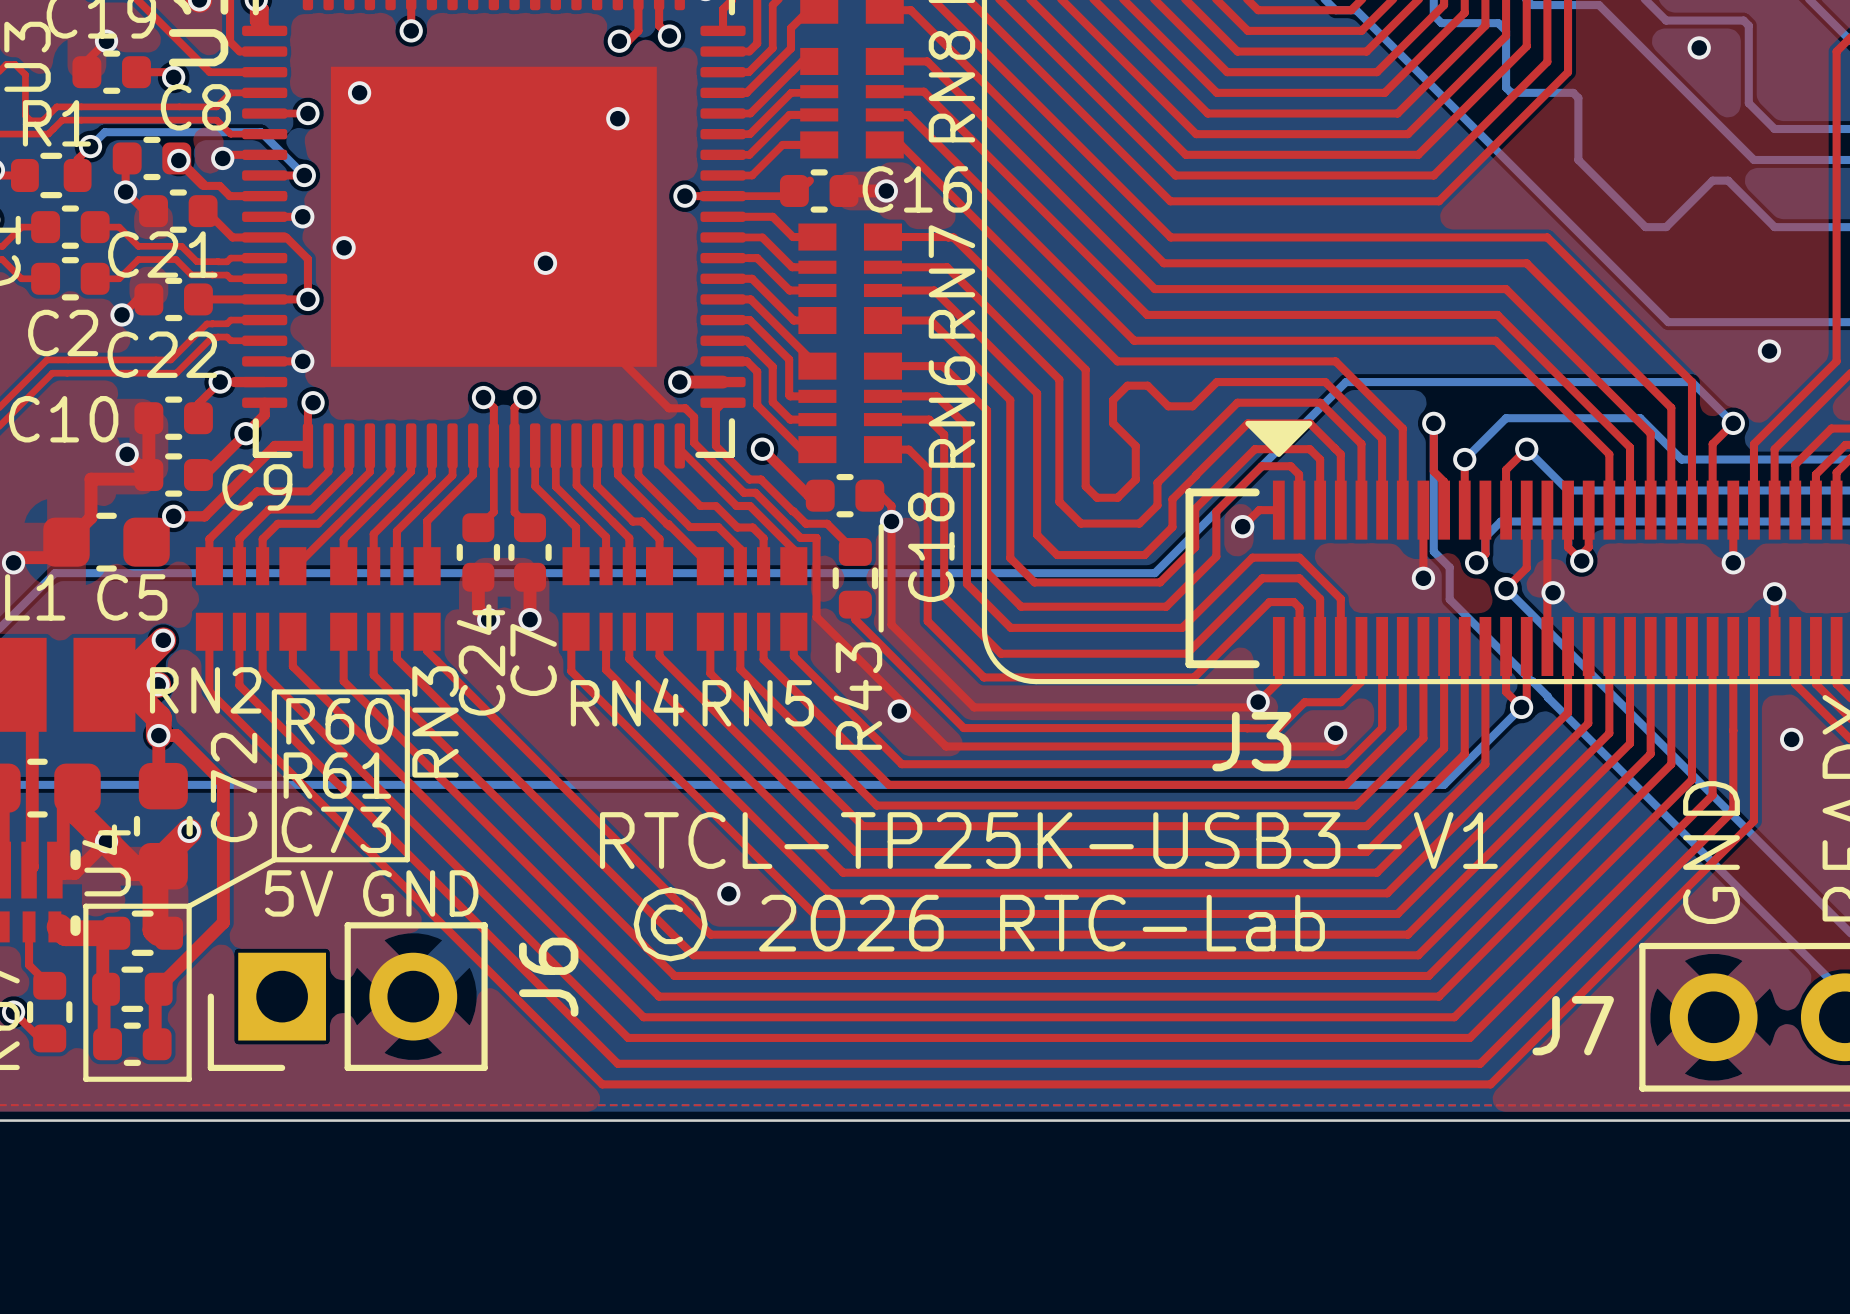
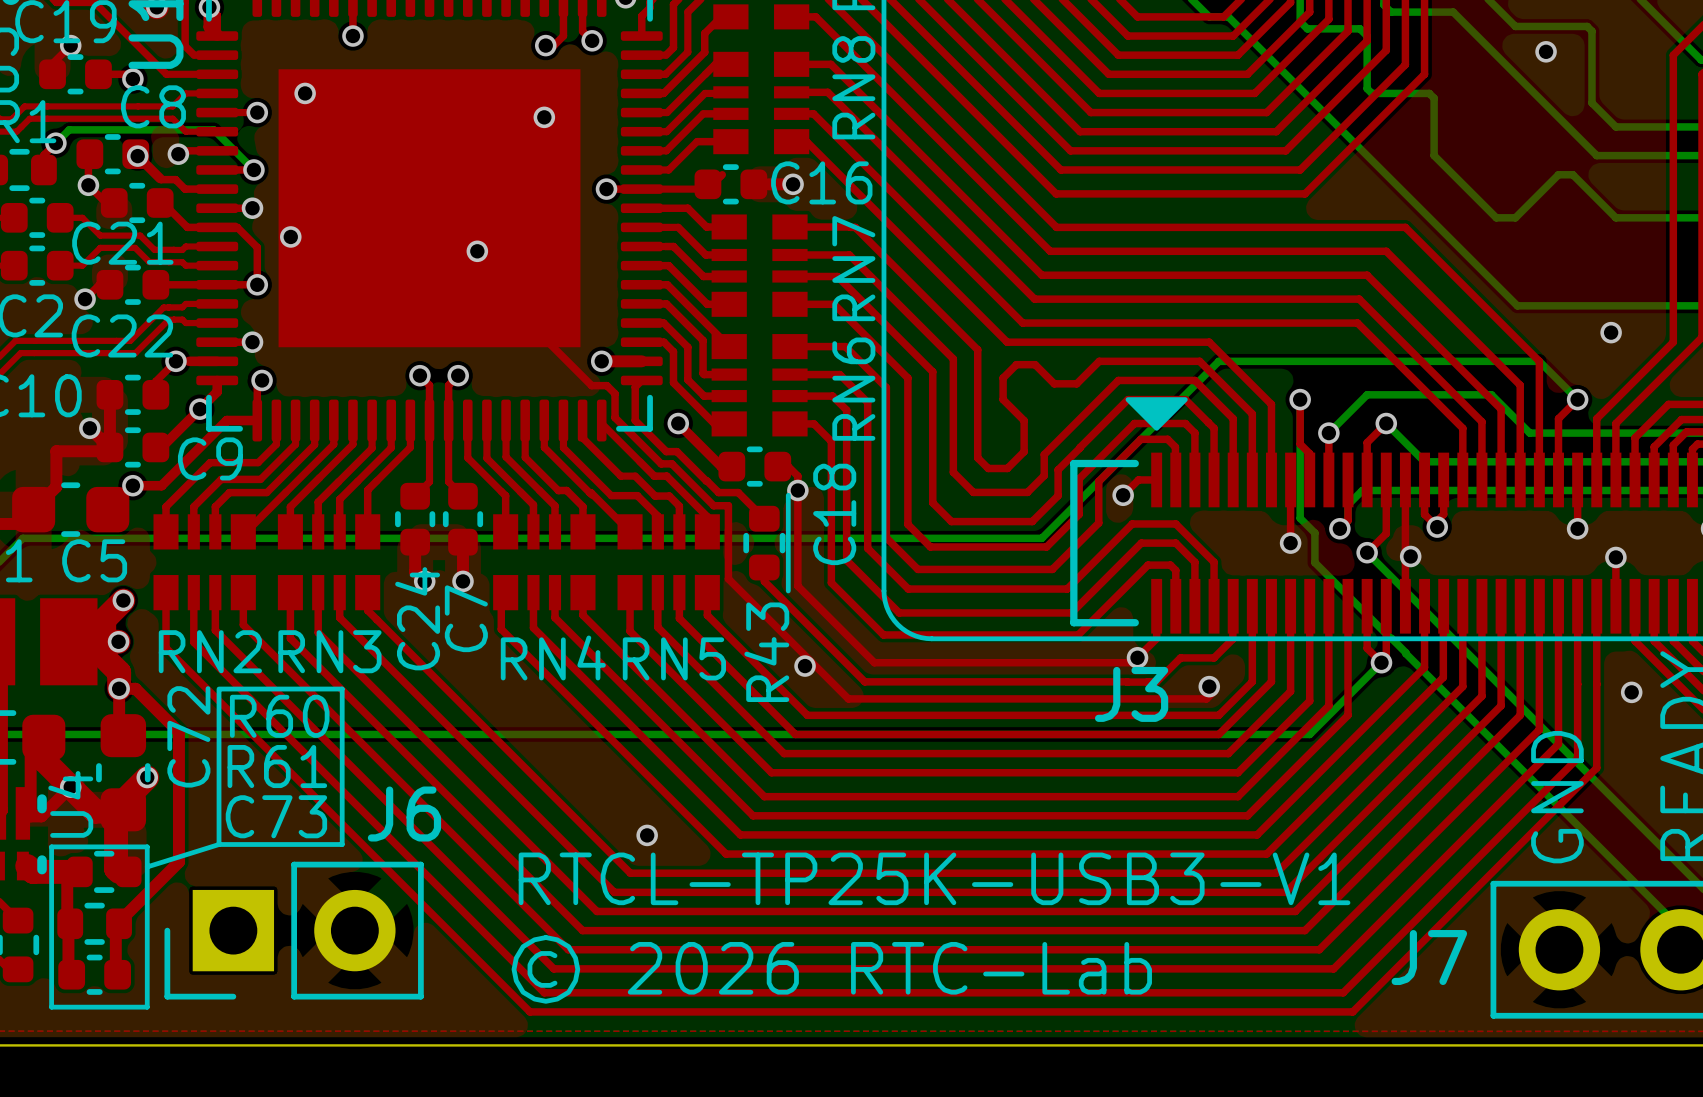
RN2 name position: RN2 (205, 690) -> RN2 (210, 651)
line: (274, 691) (274, 859) -> (219, 689) (219, 844)
line: (275, 691) (407, 691) (407, 859) (274, 859) -> (220, 689) (342, 689) (342, 844) (219, 844)
R60 name position: R60 (339, 721) -> R60 (279, 716)
RN3 name rotation: 0° (435, 721) -> 90° clockwise (329, 651)
R61 name position: R61 (337, 775) -> R61 (277, 766)
C73 name position: C73 (336, 829) -> C73 (276, 816)
text position: RTCL-TP25K-USB3-V1 (1048, 840) -> RTCL-TP25K-USB3-V1 (934, 878)
line: (274, 859) (189, 906) -> none
text: 5V (299, 893) -> none
text: GND (420, 893) -> none
line: none -> (219, 844) (147, 866)
text position: © 2026 RTC-Lab (979, 924) -> © 2026 RTC-Lab (831, 969)
J6 name rotation: 0° (548, 977) -> 90° clockwise (404, 814)
J6 name position: J6 (548, 977) -> J6 (404, 814)

